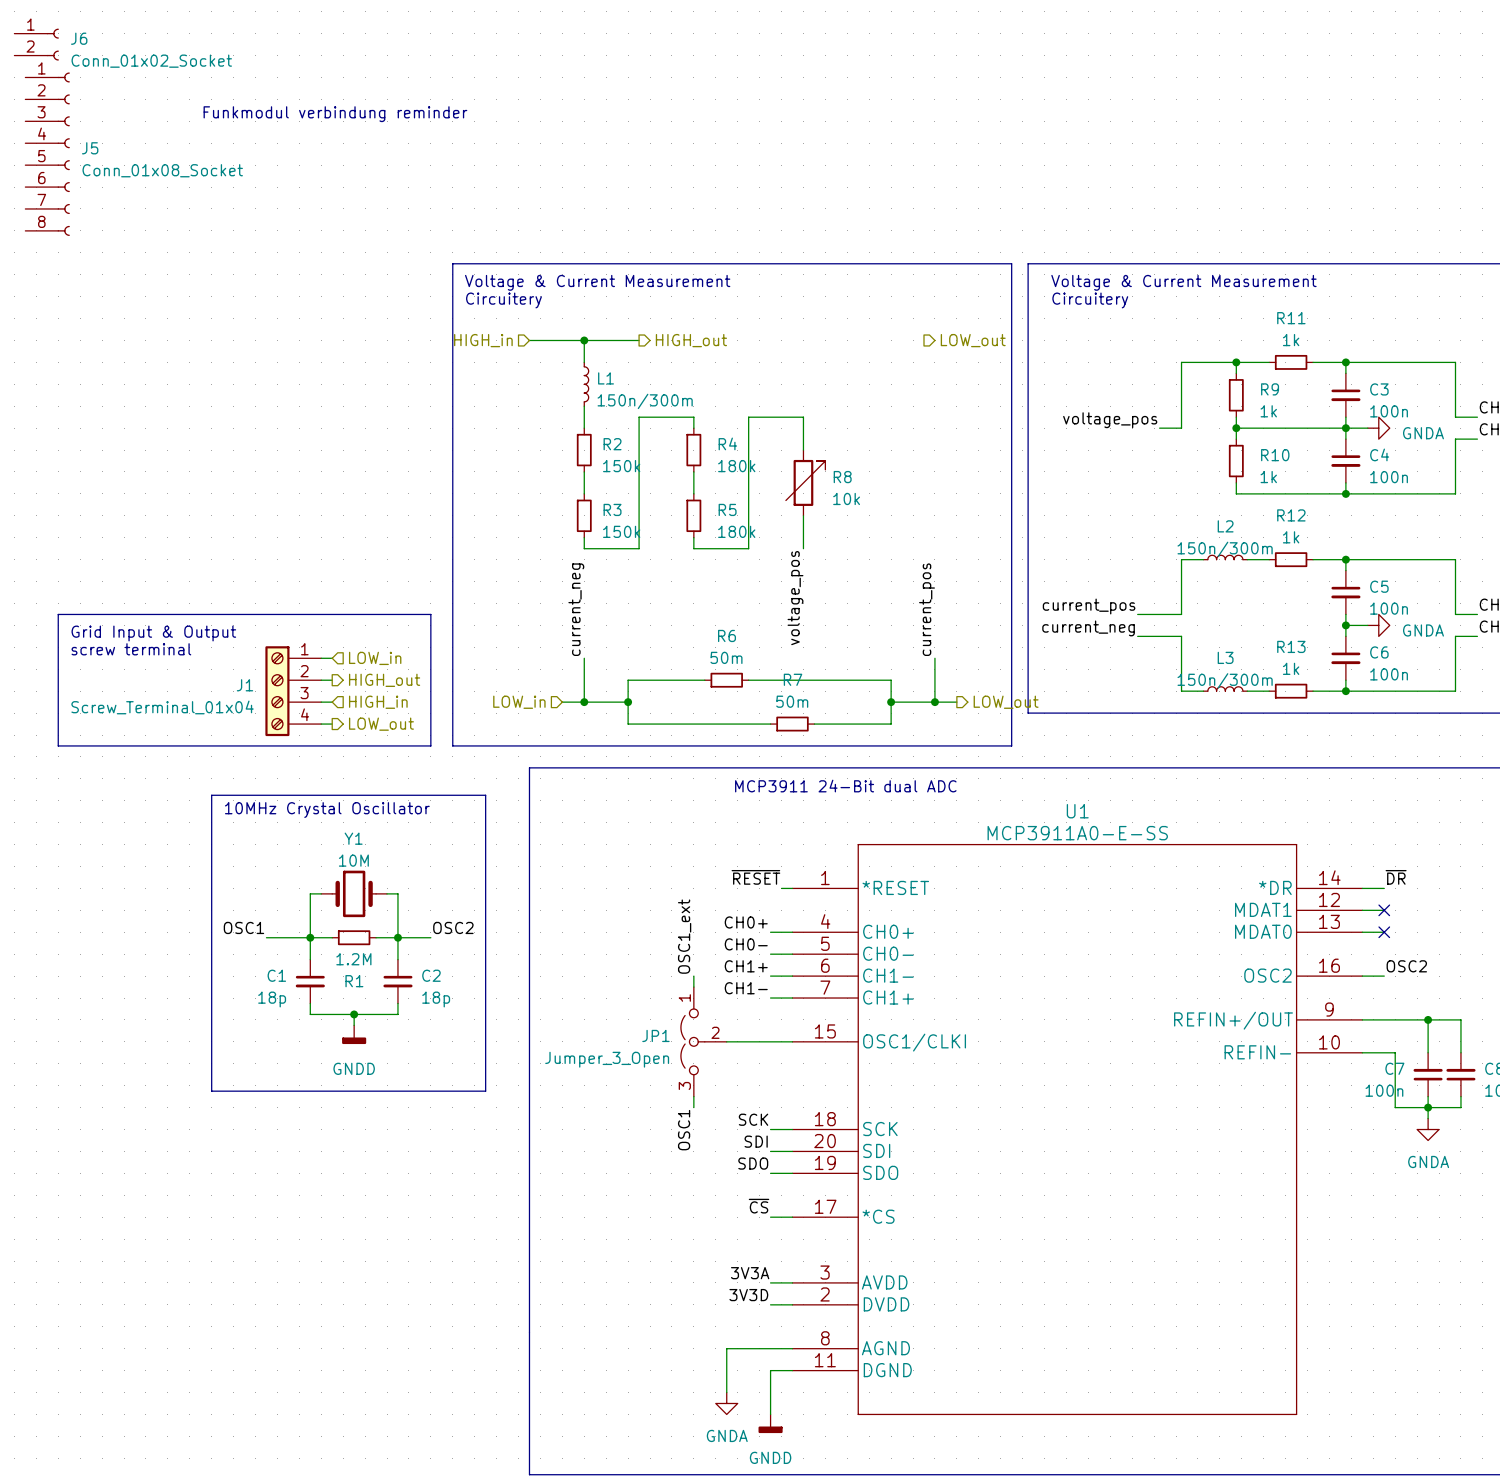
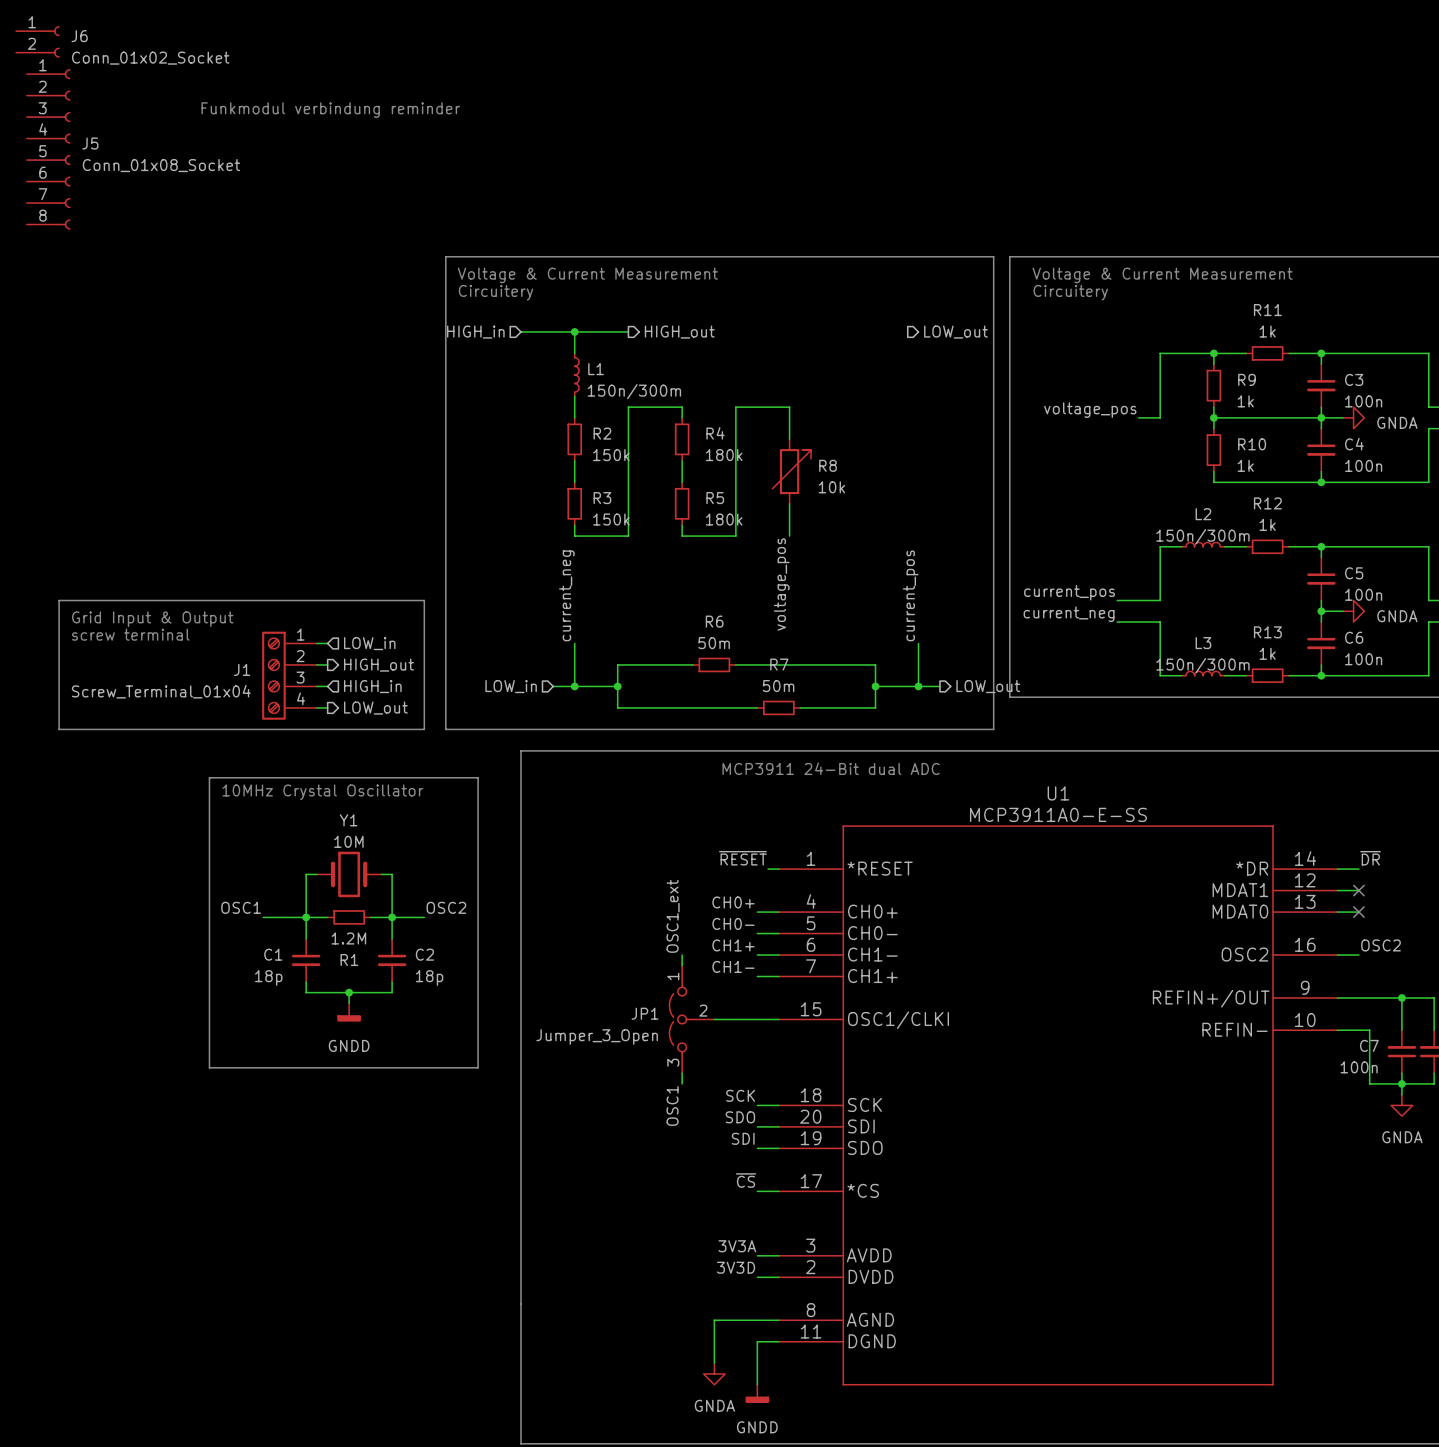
label: SDI (756, 1141) -> SDO (740, 1117)
label: SDO (753, 1163) -> SDI (743, 1138)

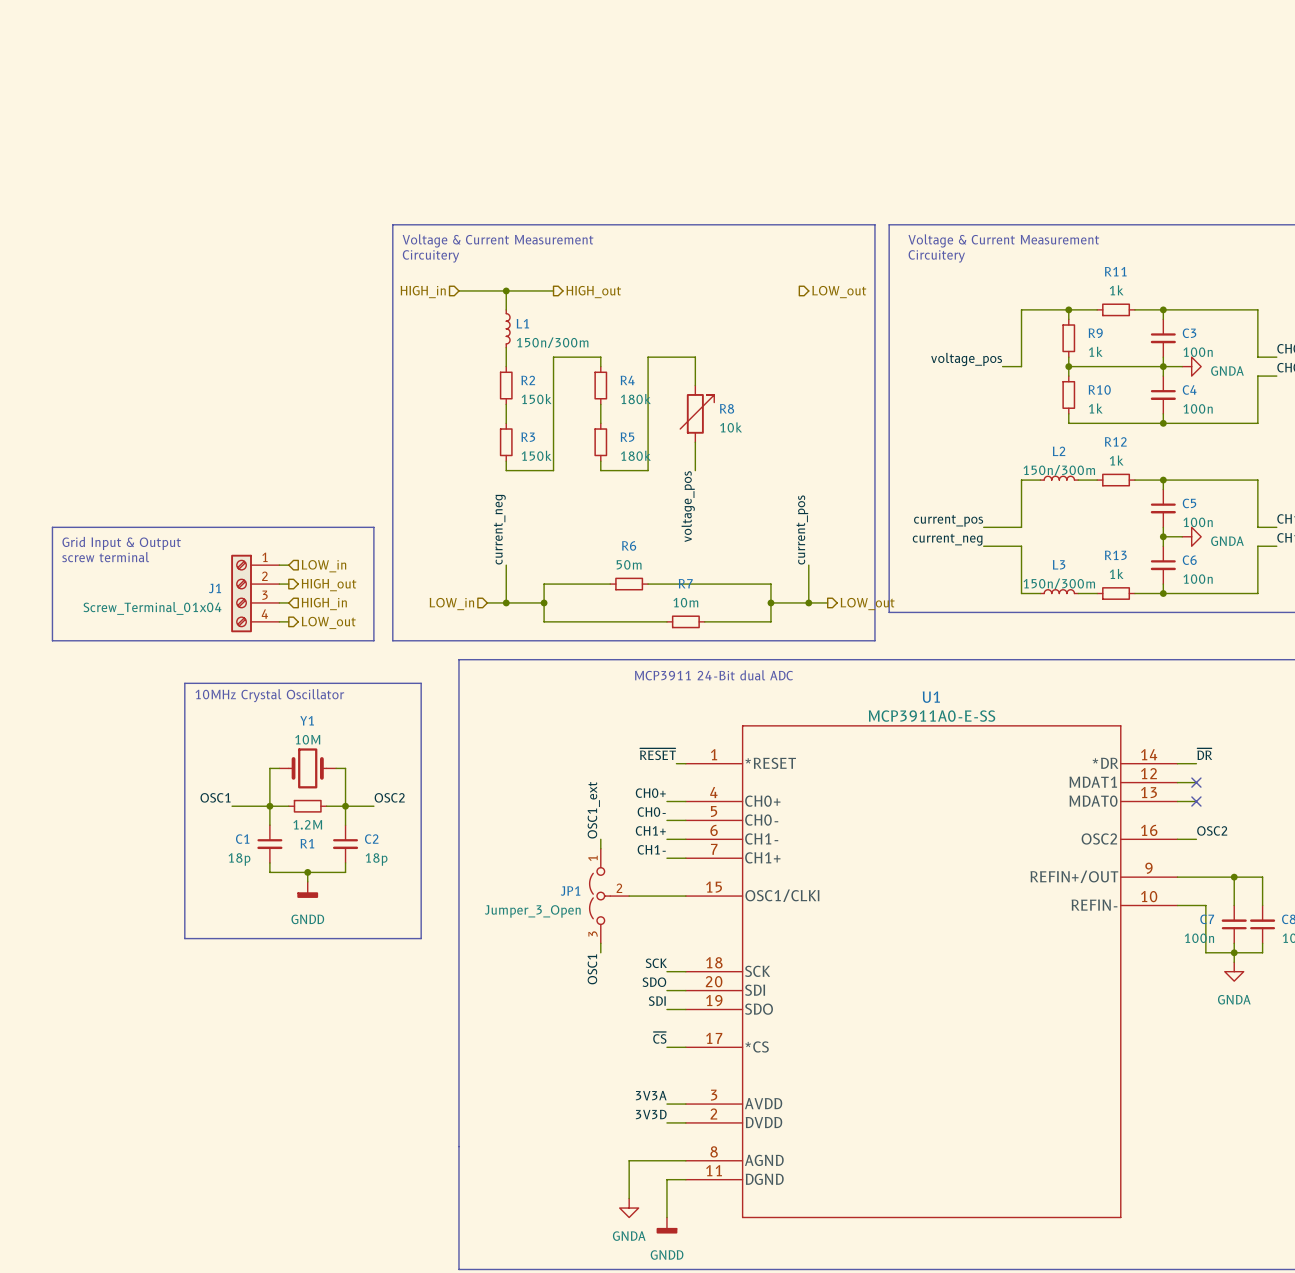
J6: Conn_01x02_Socket (37, 41) -> none
text: Funkmodul verbindung reminder (330, 110) -> none
J5: Conn_01x08_Socket (48, 149) -> none
R7 value: 50m (778, 686) -> 10m (685, 602)

